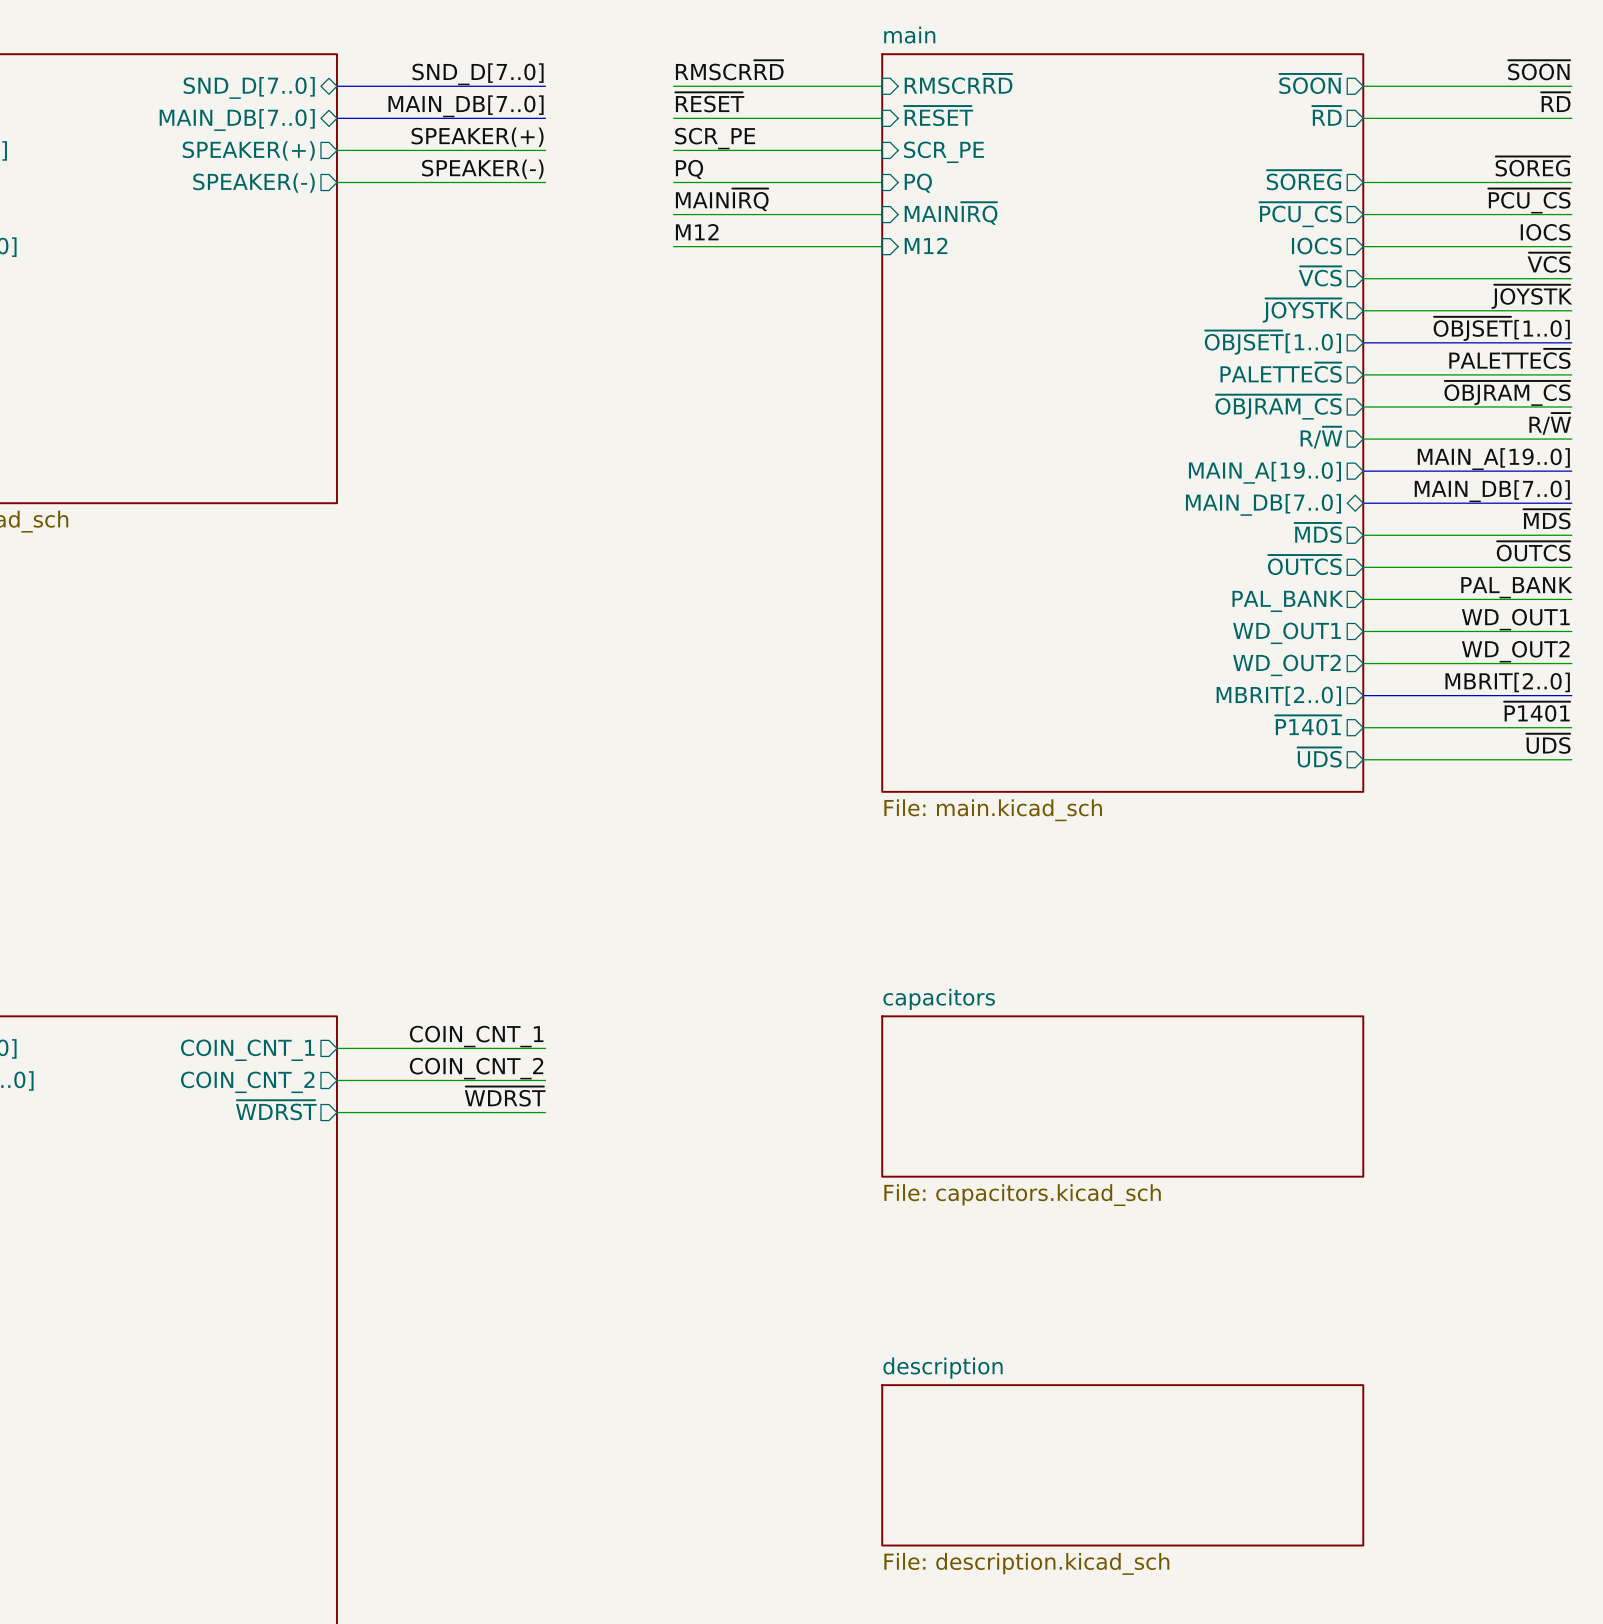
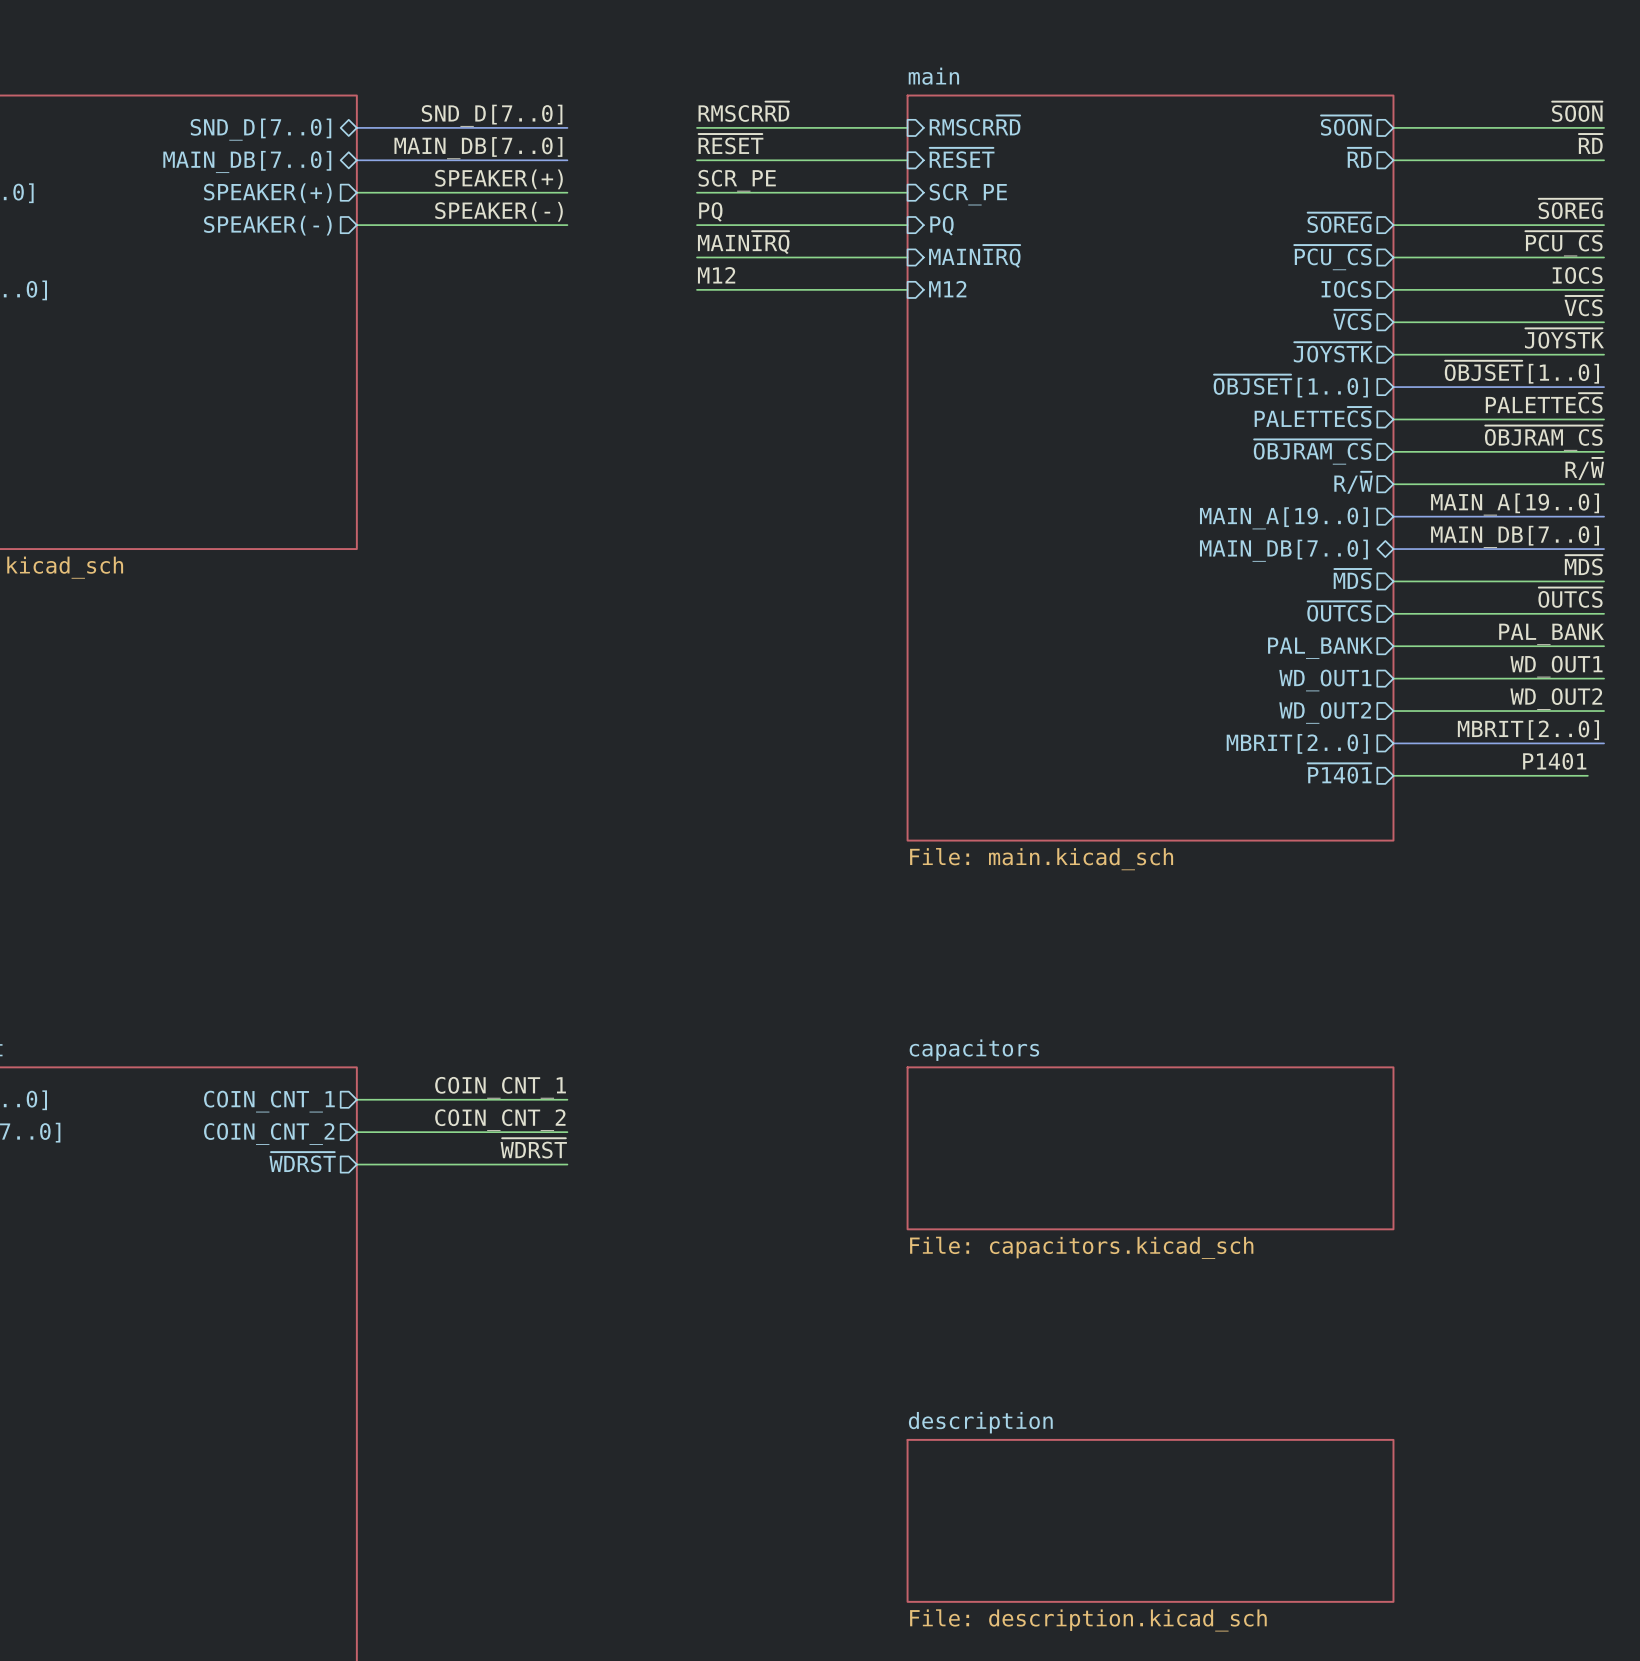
label: ~{P1401} (1537, 711) -> P1401 (1554, 761)
wire: (1555, 727) (1571, 727) -> none
label: ~{UDS} (1548, 743) -> none
sheet pin: ~{UDS} (1319, 757) -> none
wire: (1363, 759) (1571, 759) -> none

